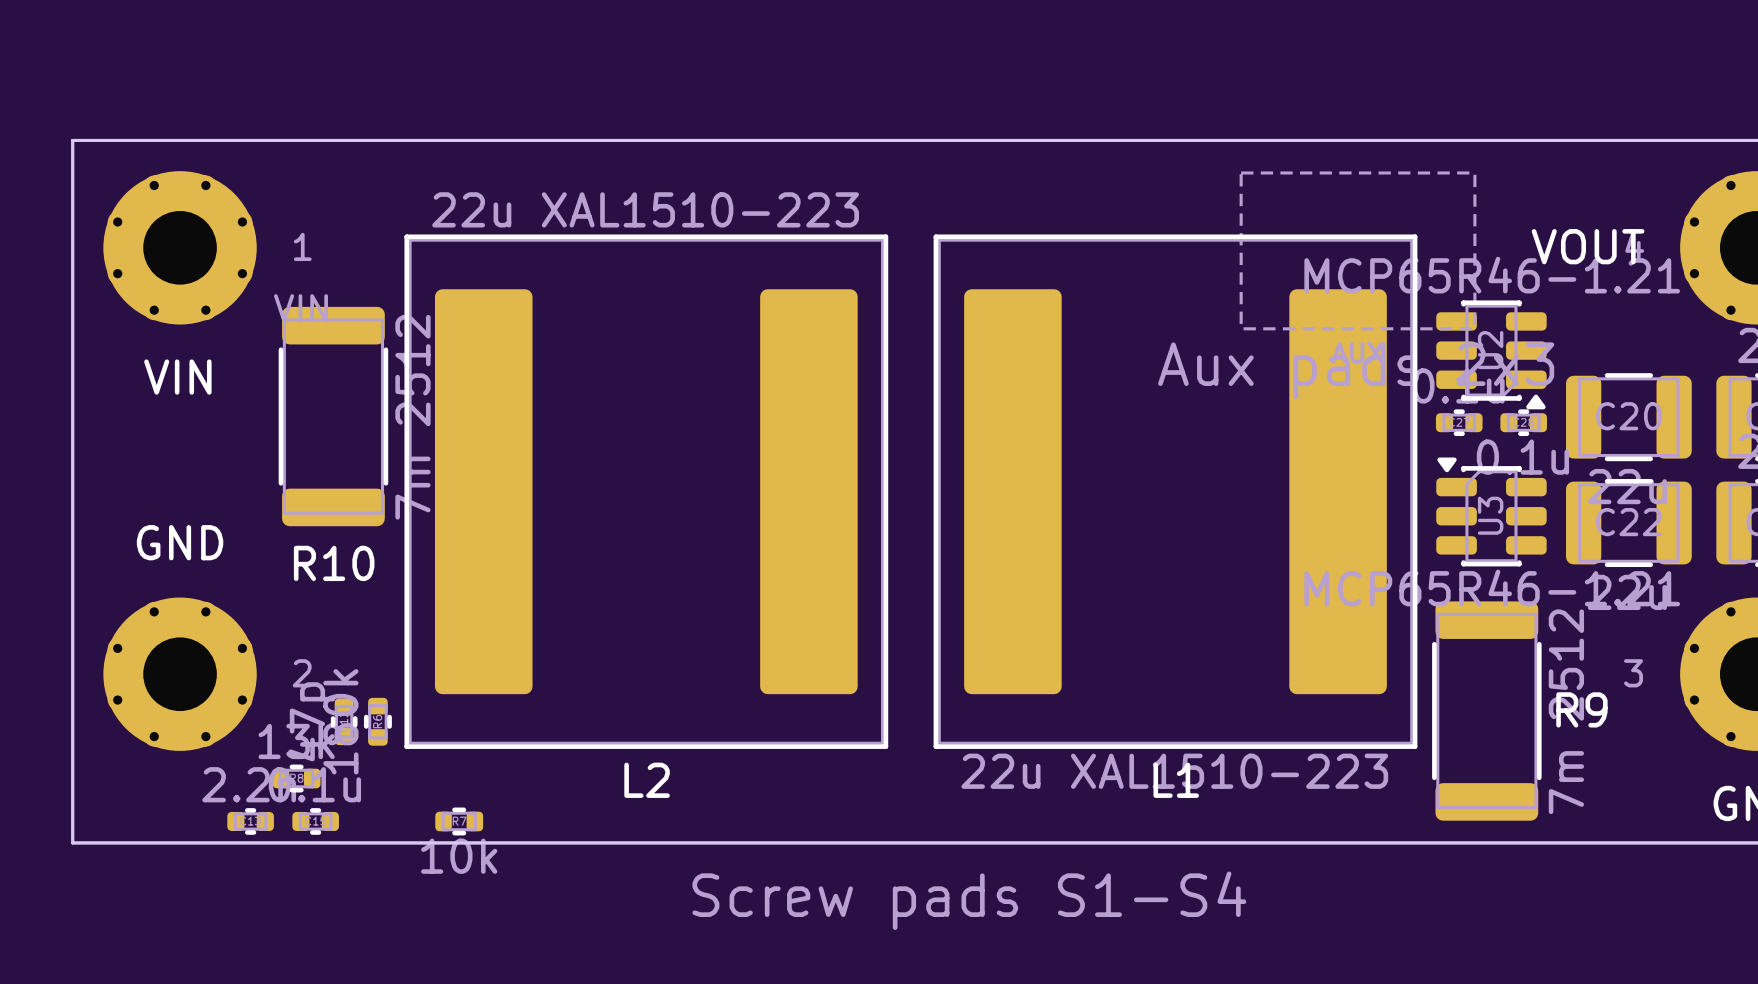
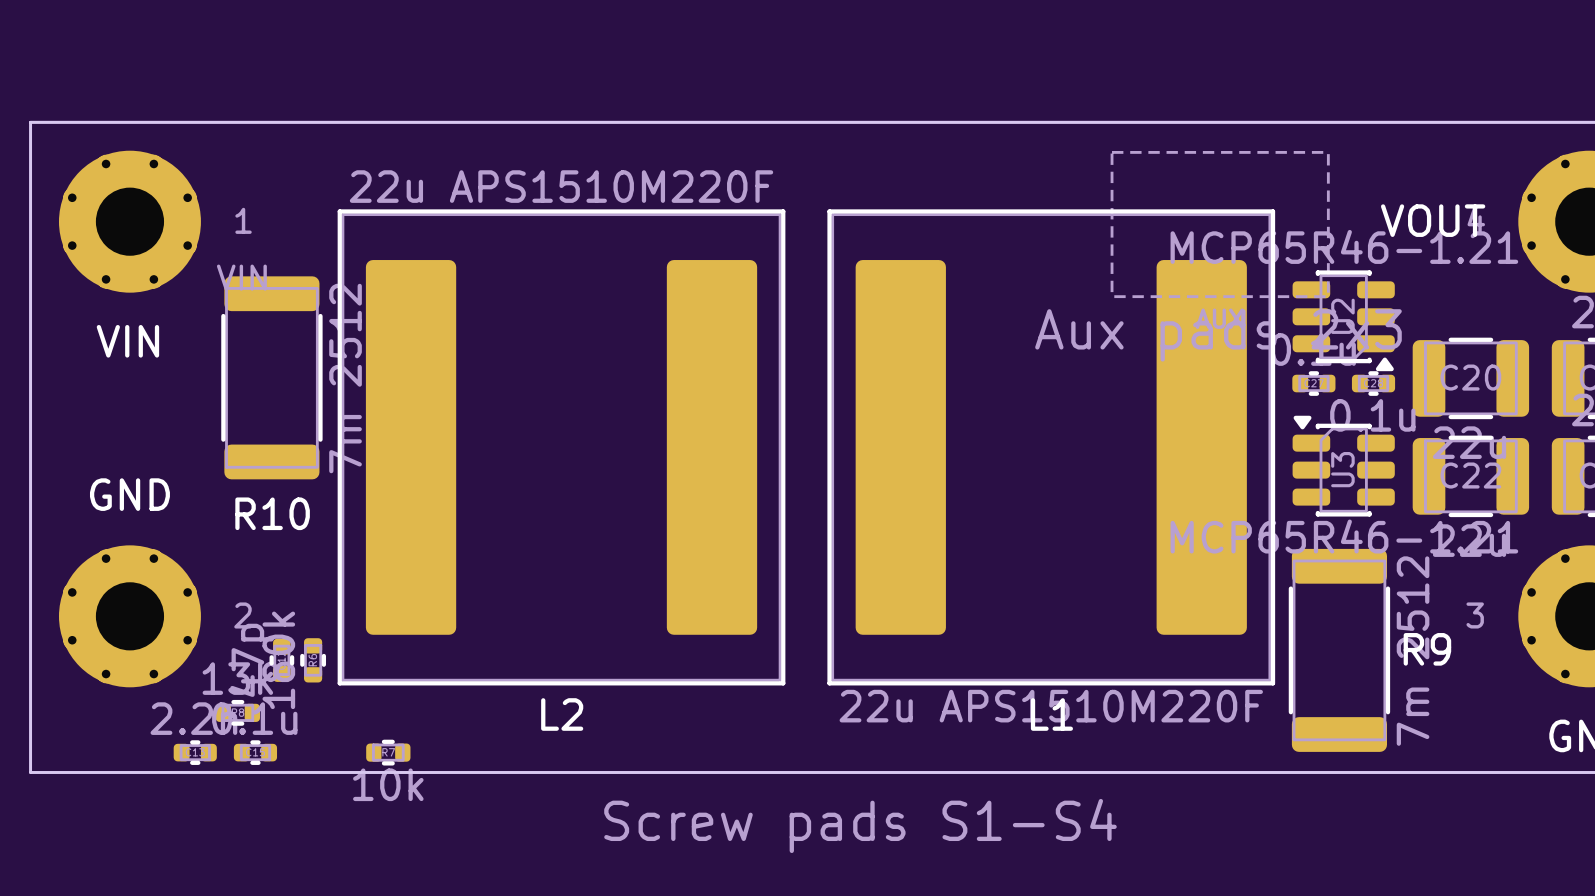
L2 value: 22u XAL1510-223 (645, 209) -> 22u APS1510M220F (561, 186)
L1 value: 22u XAL1510-223 (1174, 771) -> 22u APS1510M220F (1051, 706)

